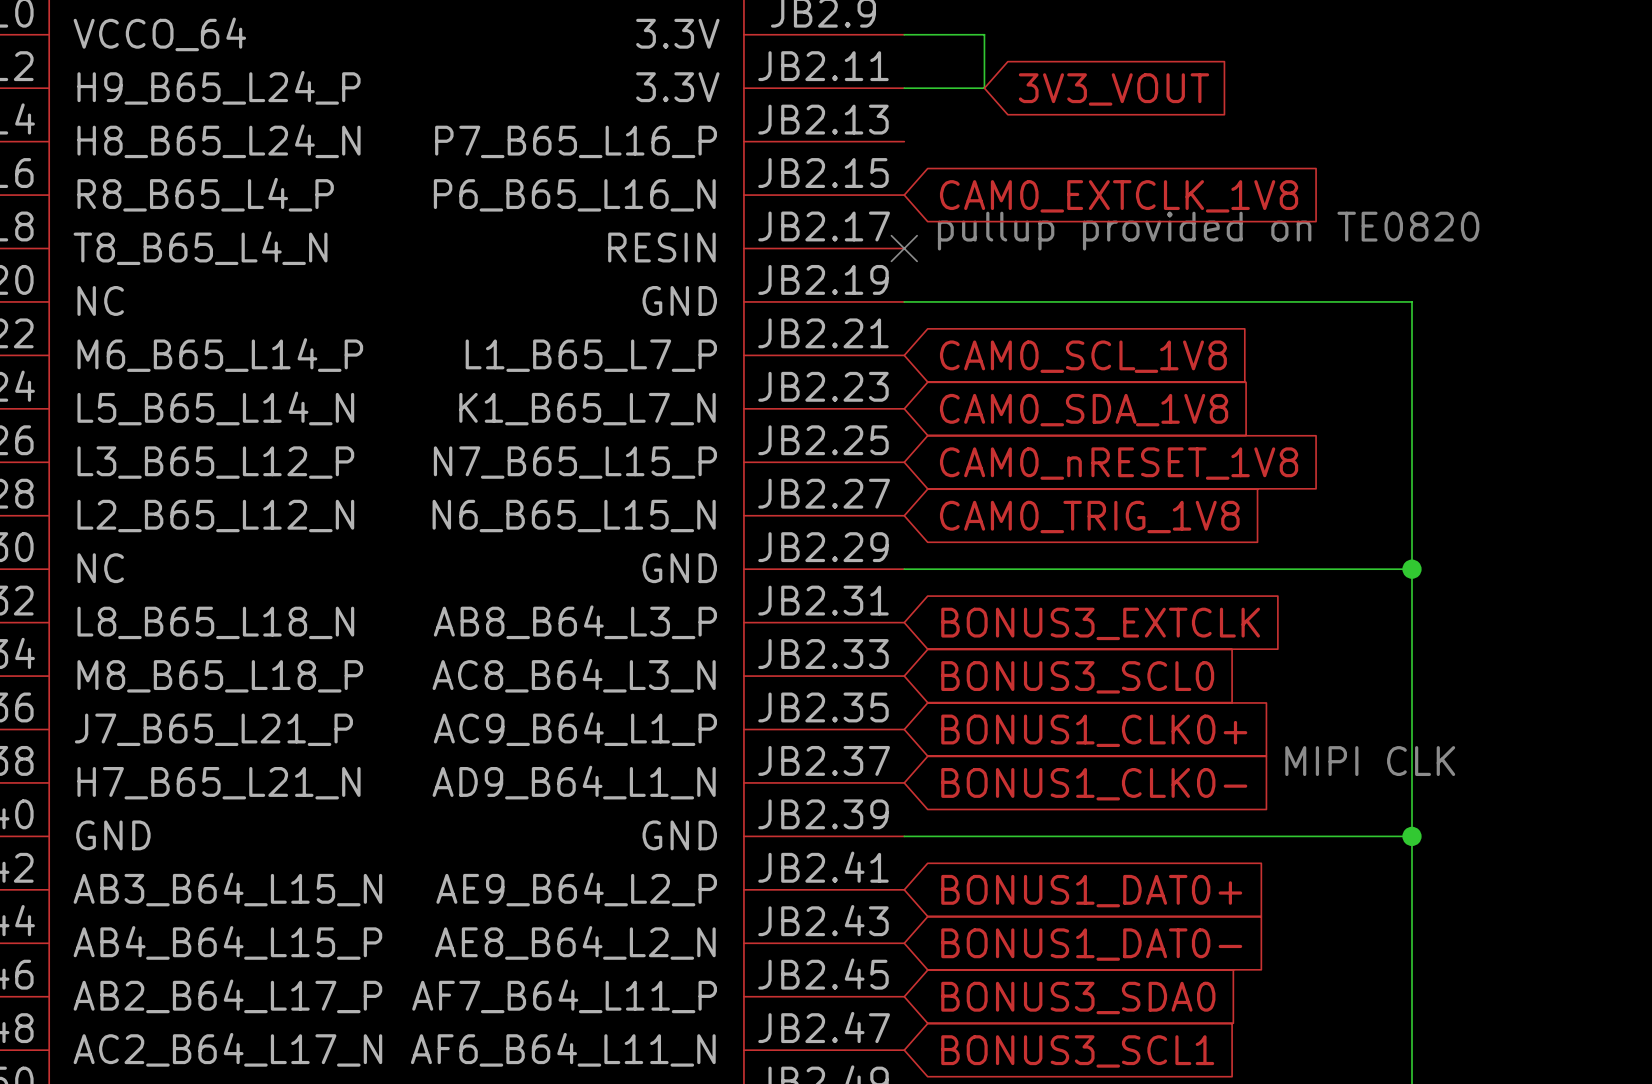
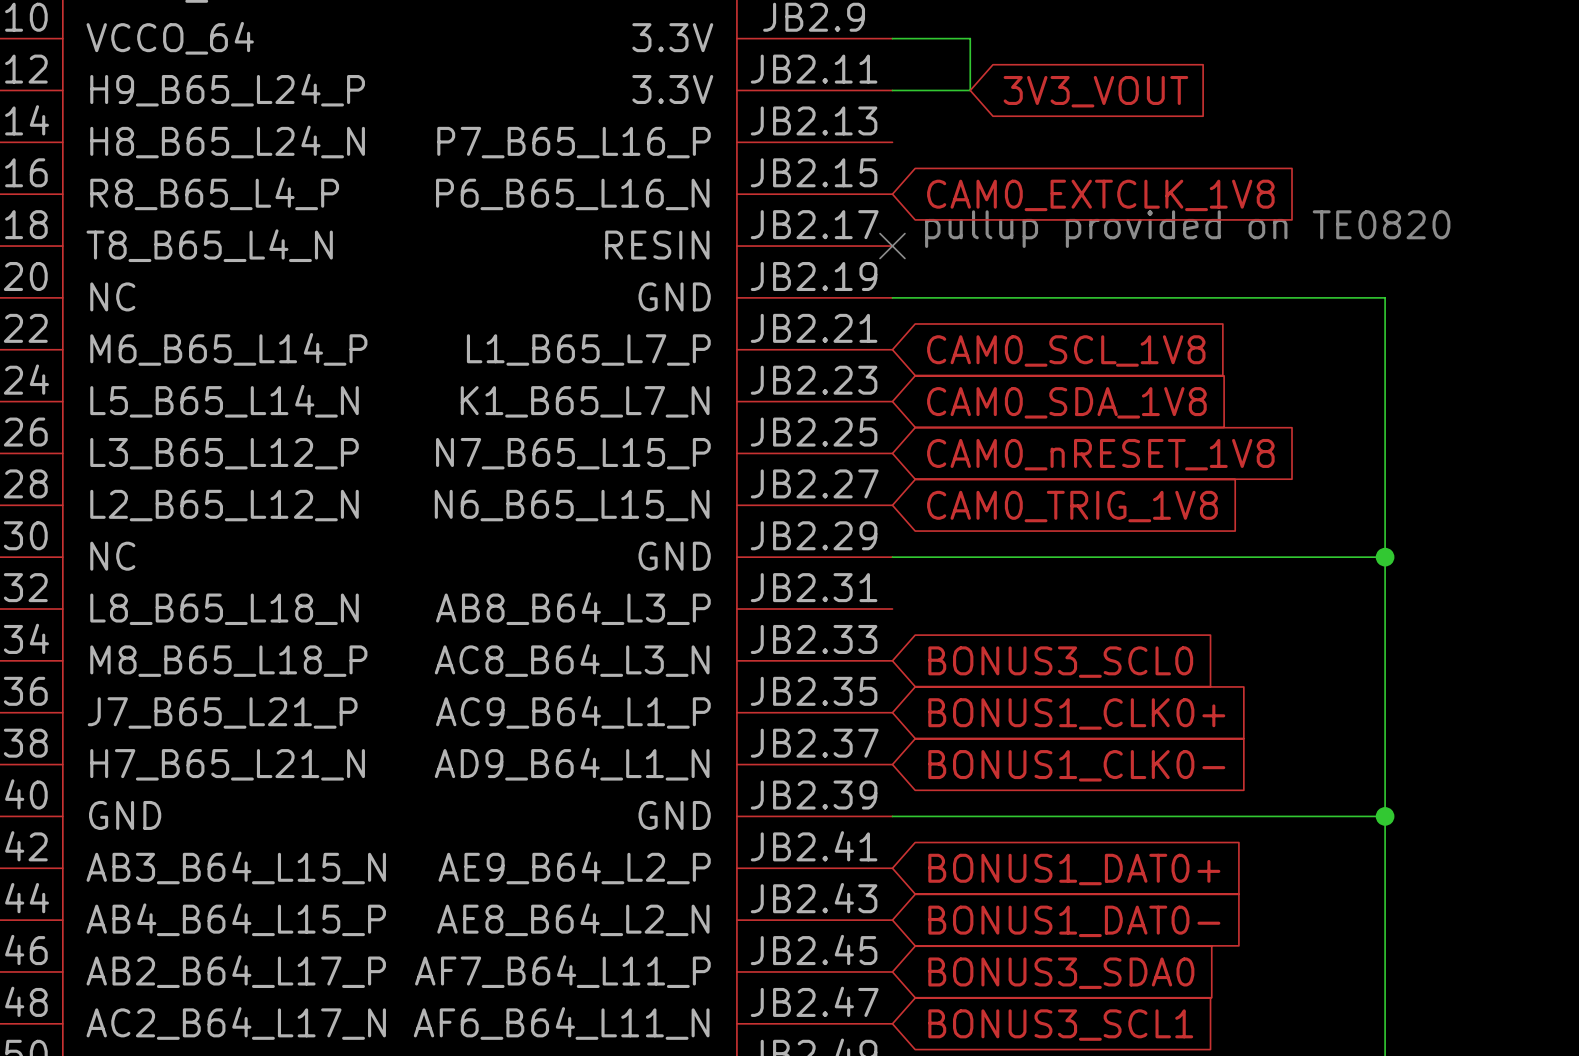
global label: BONUS3_EXTCLK (1100, 623) -> none
text: MIPI CLK (1370, 761) -> none

